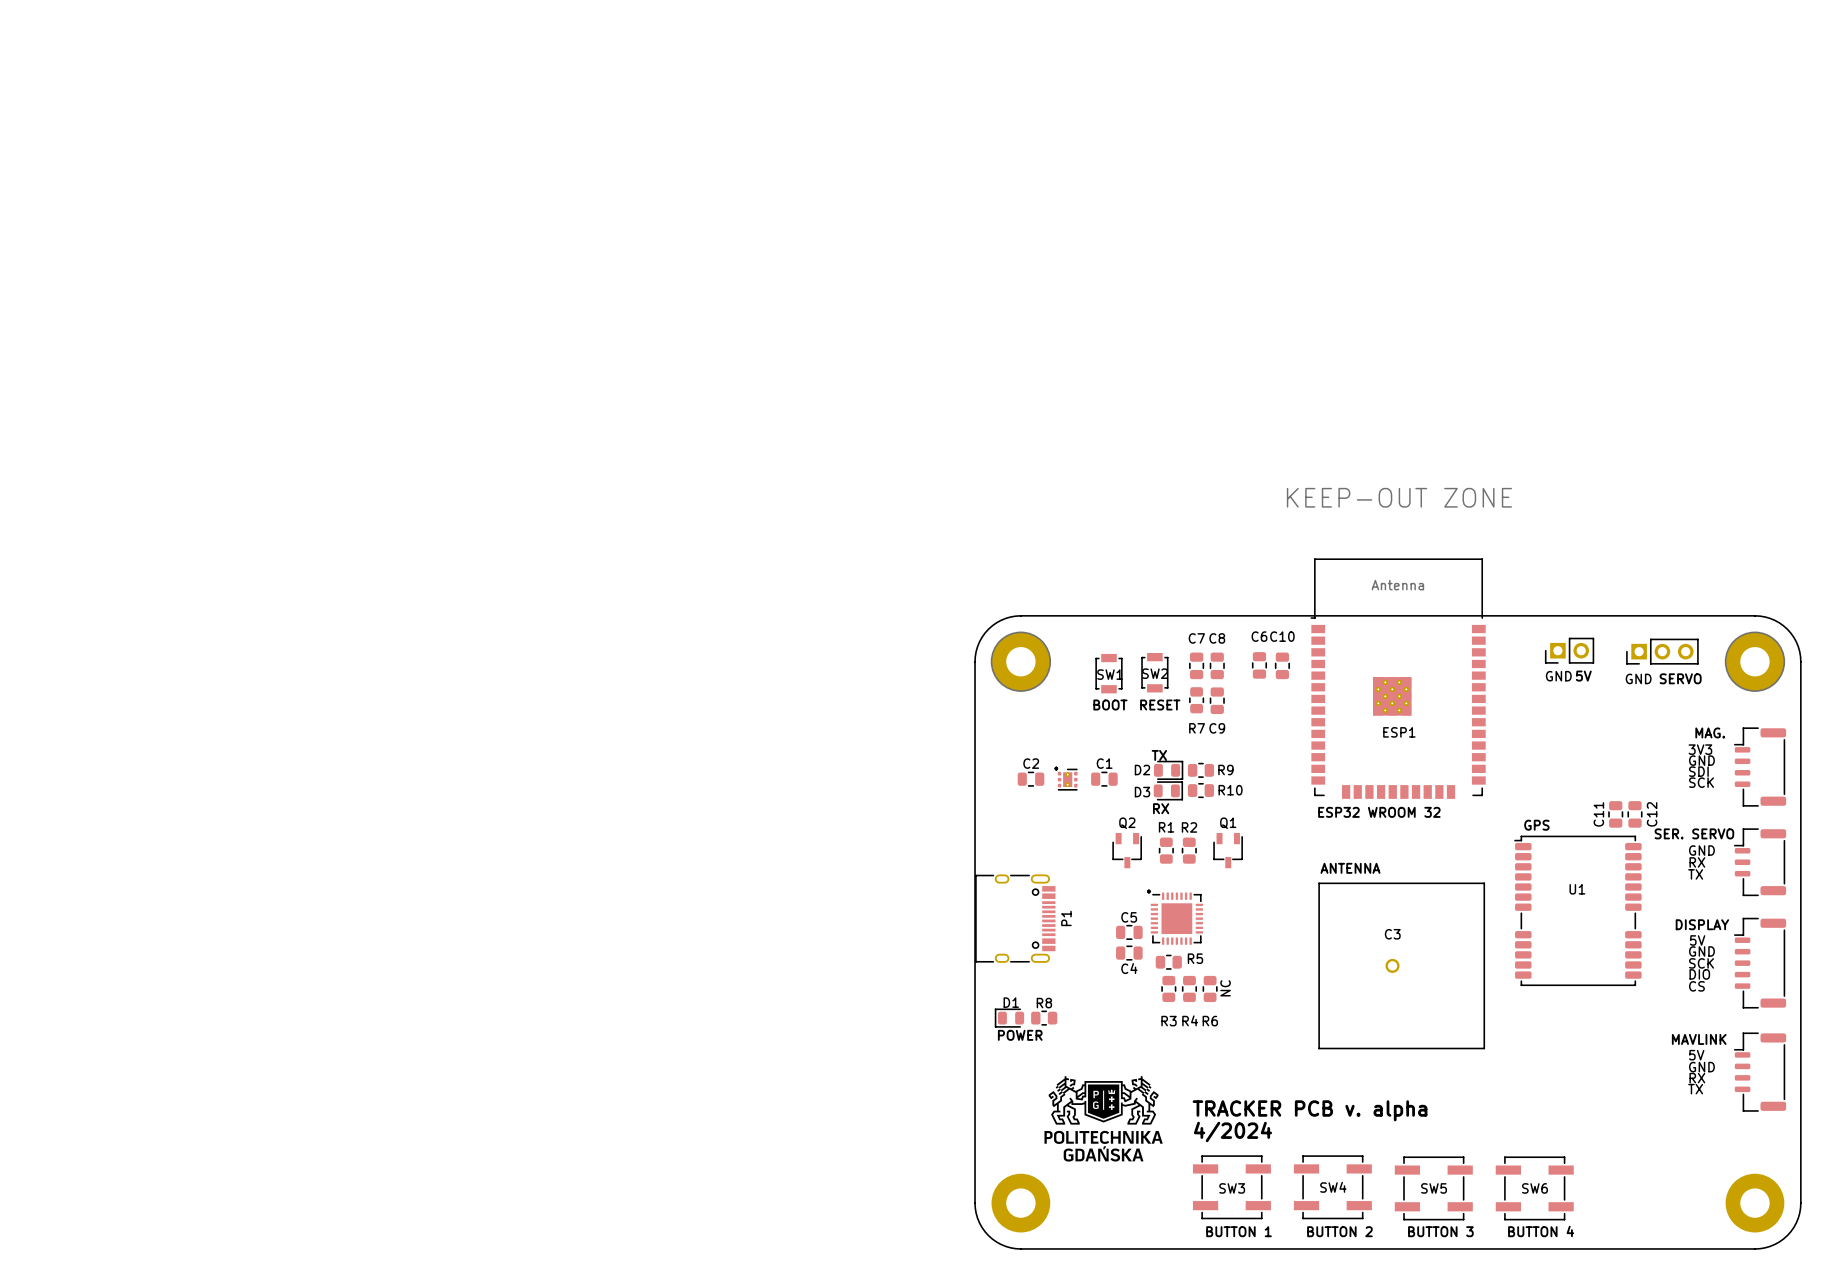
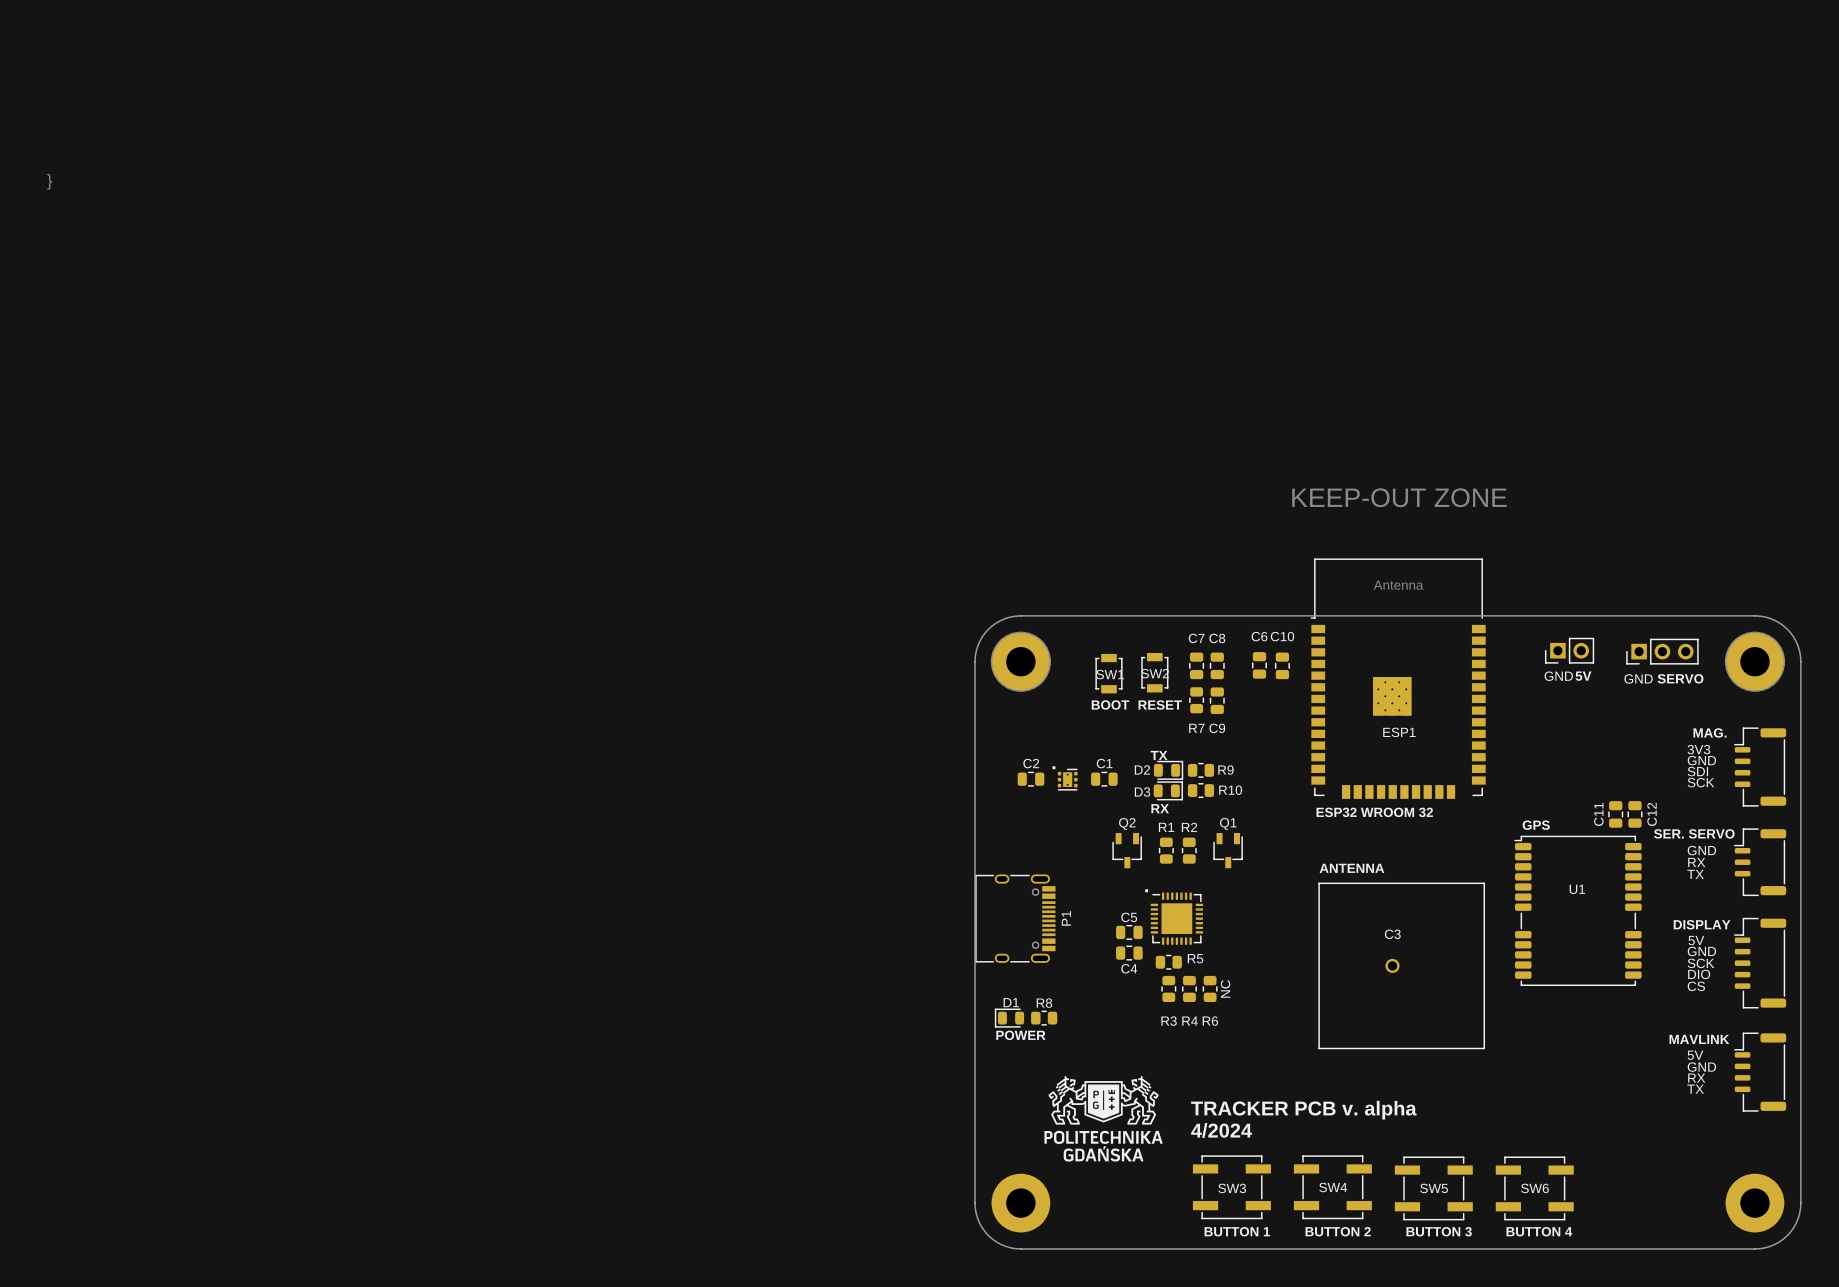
text: none -> } (49, 181)

